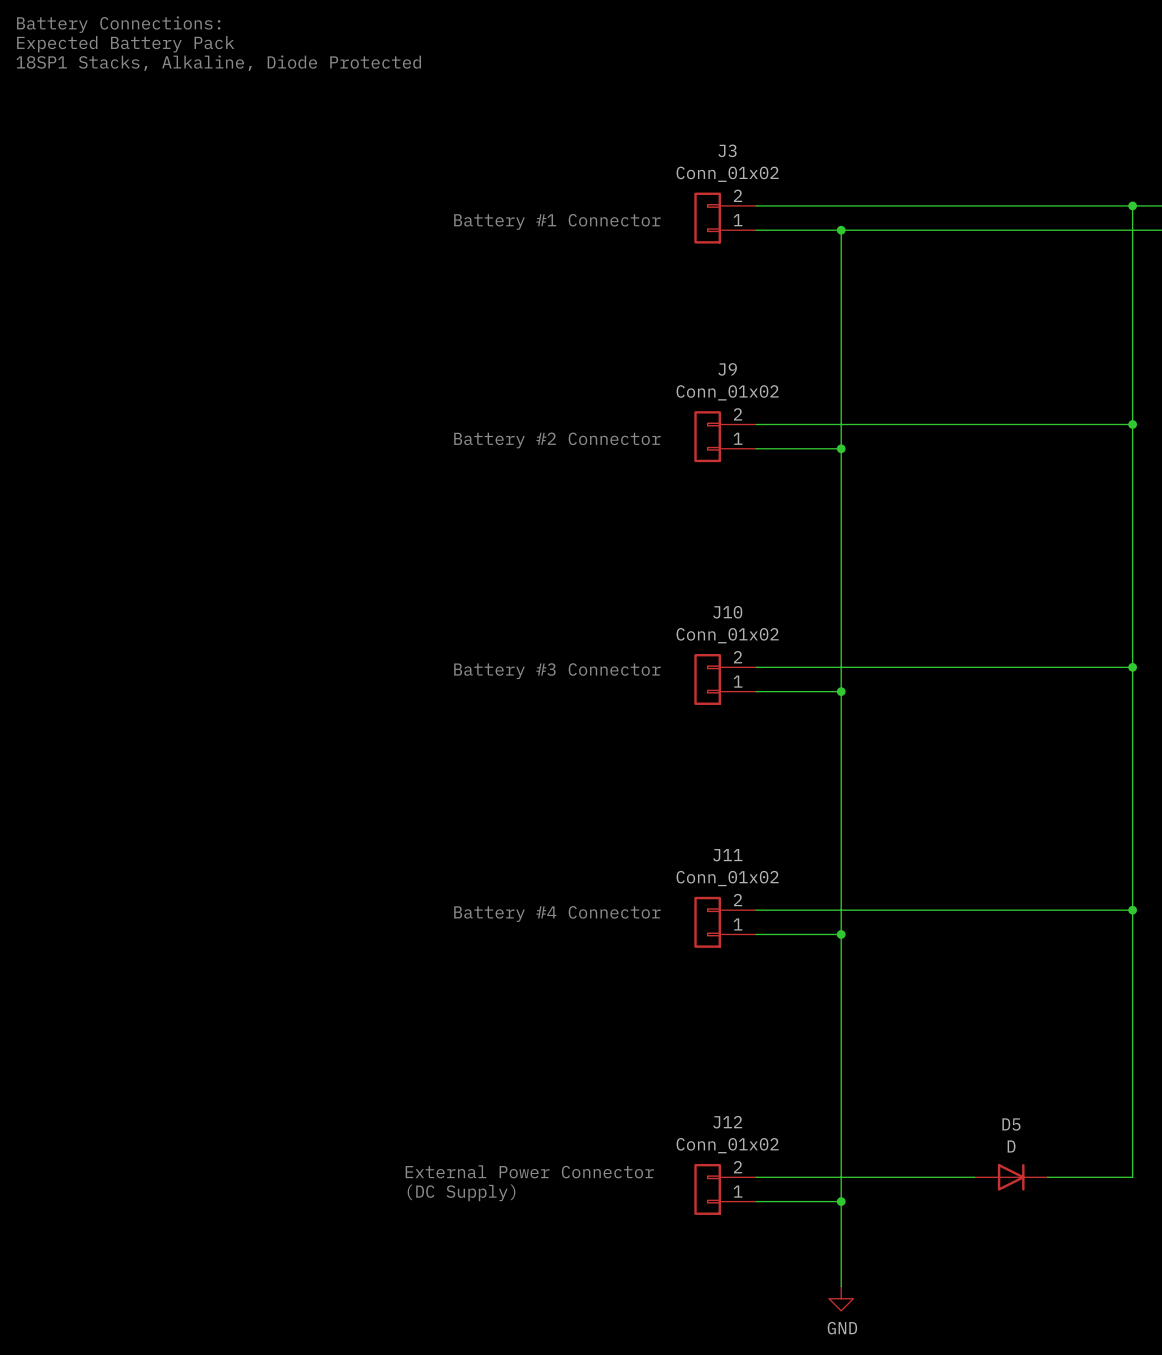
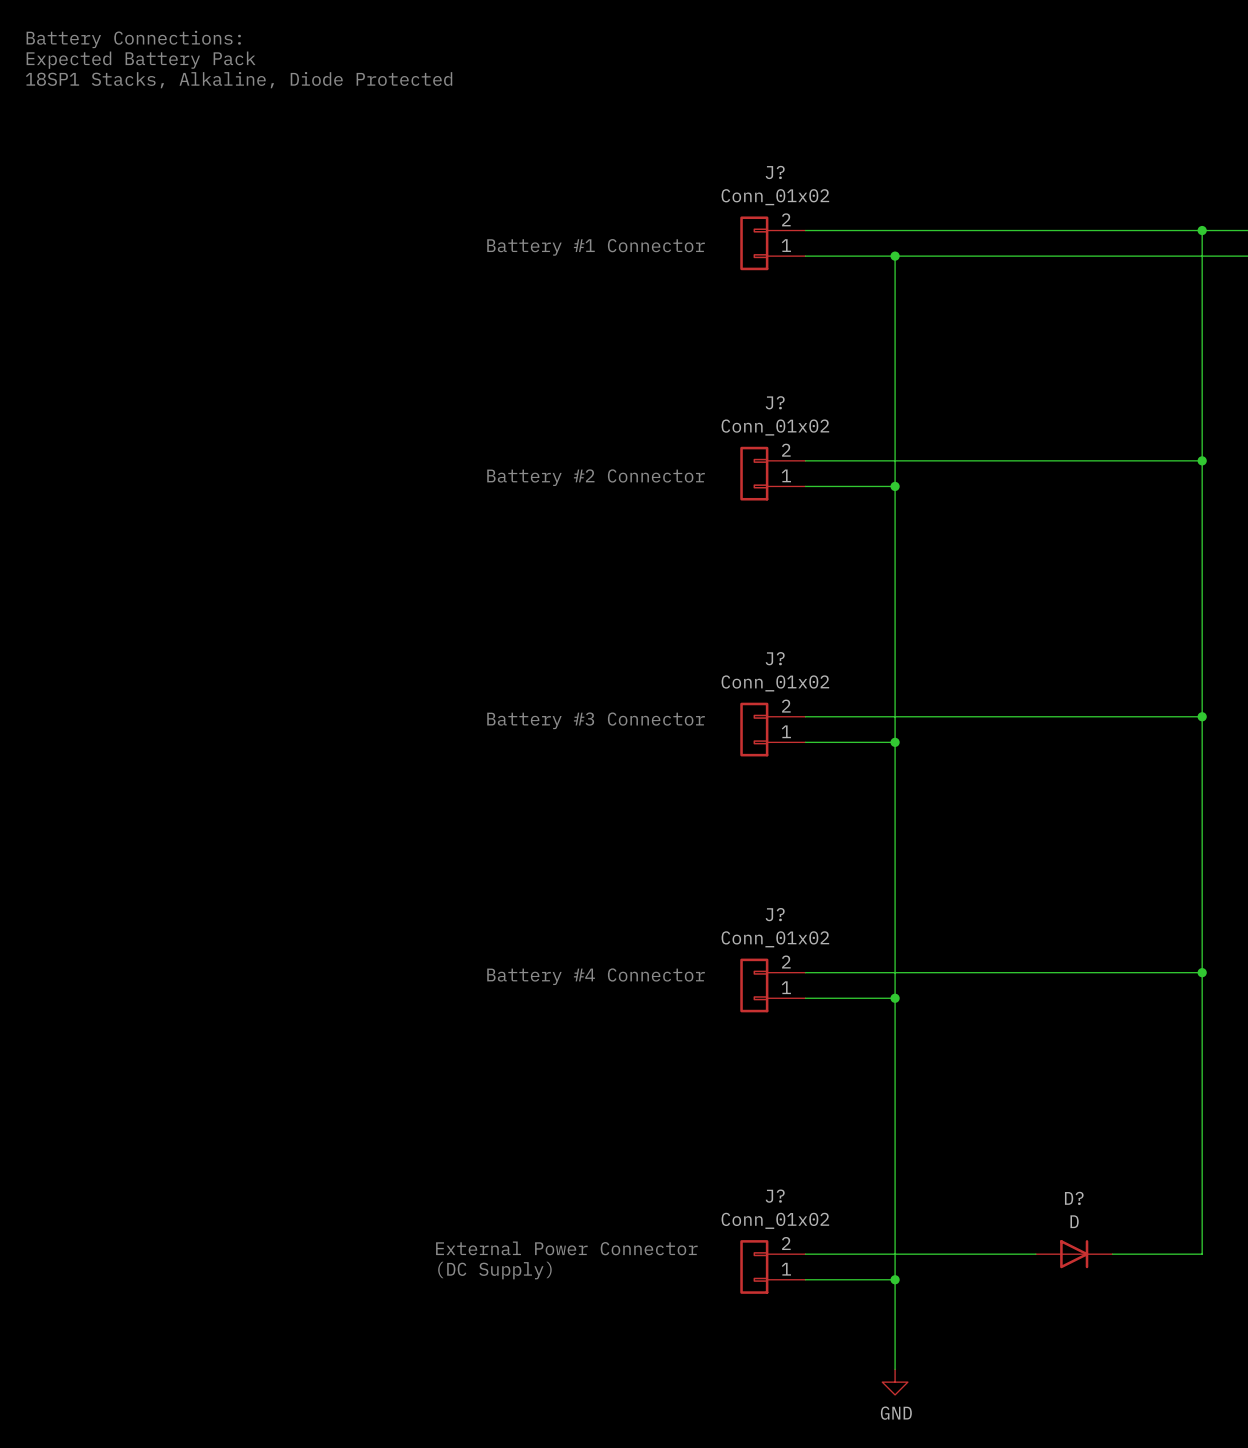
J3 name: J3 (727, 150) -> J? (775, 172)
J9 name: J9 (727, 369) -> J? (775, 402)
J10 name: J10 (727, 612) -> J? (775, 658)
J11 name: J11 (727, 855) -> J? (775, 914)
J12 name: J12 (727, 1122) -> J? (775, 1196)
D5 name: D5 (1011, 1124) -> D? (1074, 1198)

